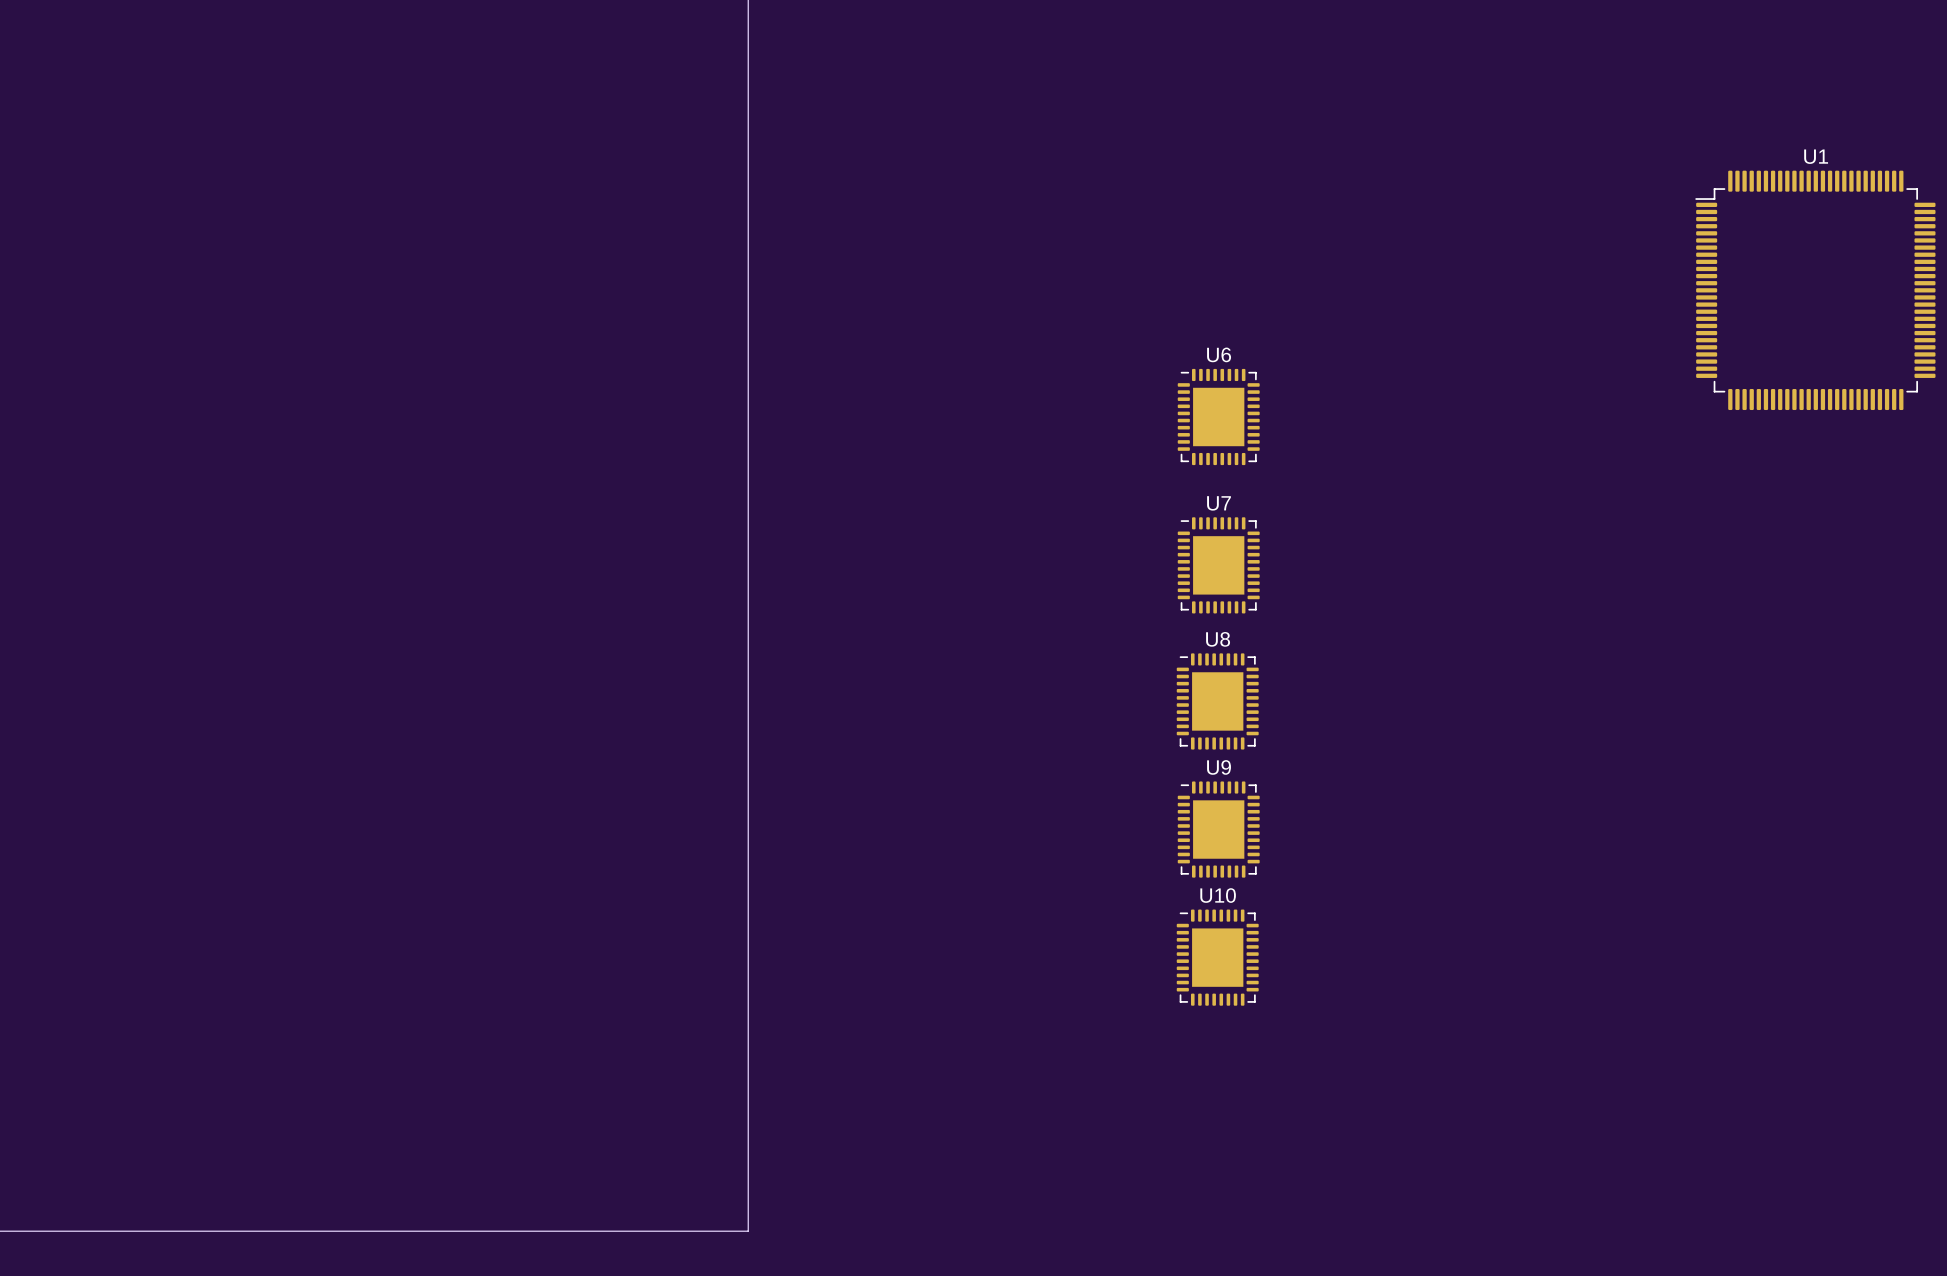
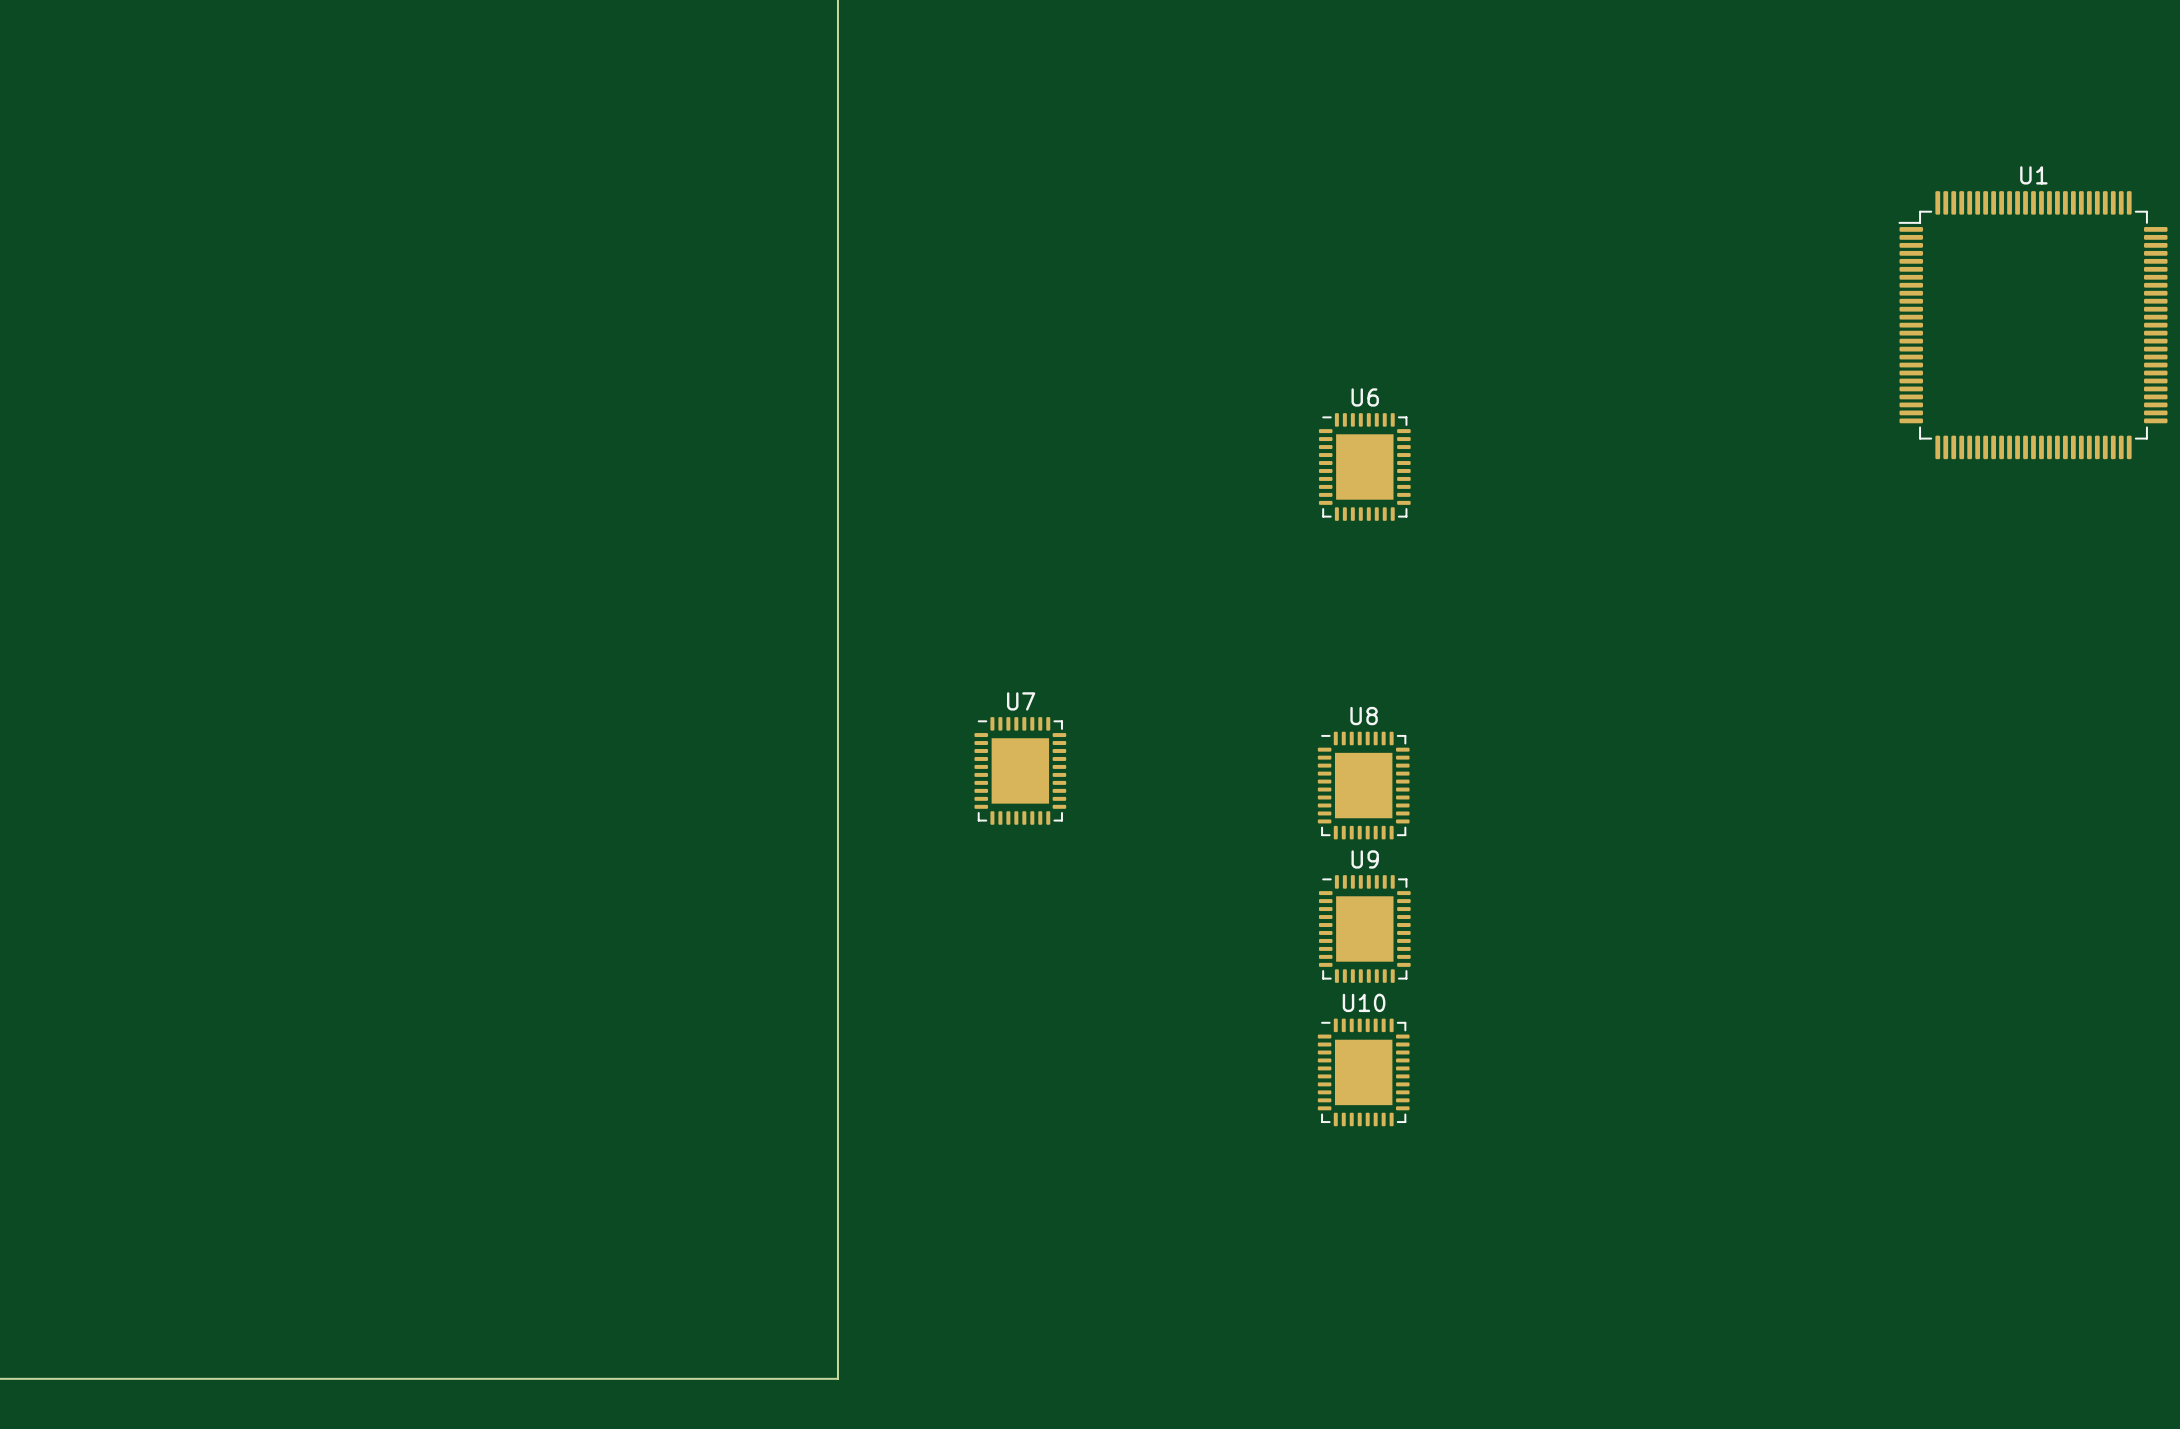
U7 position: (1218, 565) -> (1020, 770)

